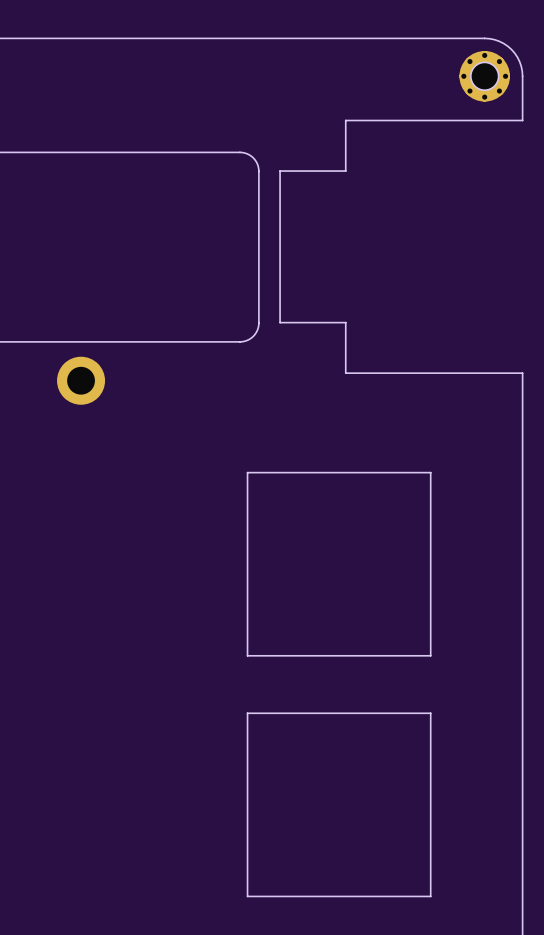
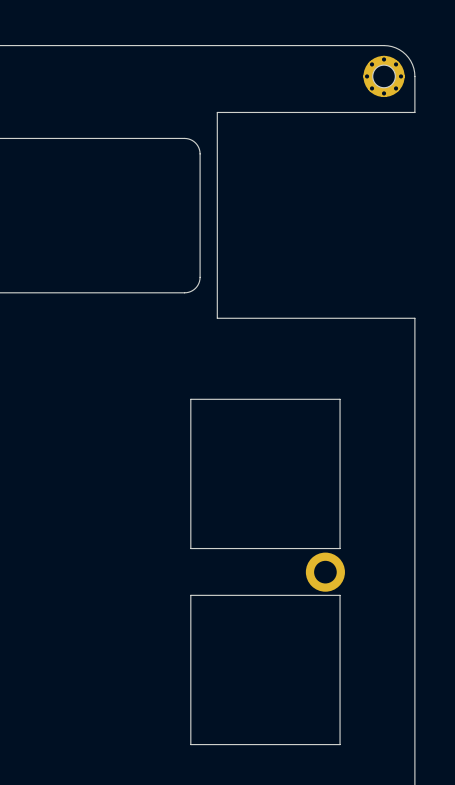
board edge: (345, 120) (345, 171) (280, 171) -> (270, 112) (217, 112) (217, 153)
board edge: (280, 322) (345, 322) (345, 373) -> (217, 277) (217, 318) (270, 318)
part: (81, 380) -> none
part: none -> (325, 572)

